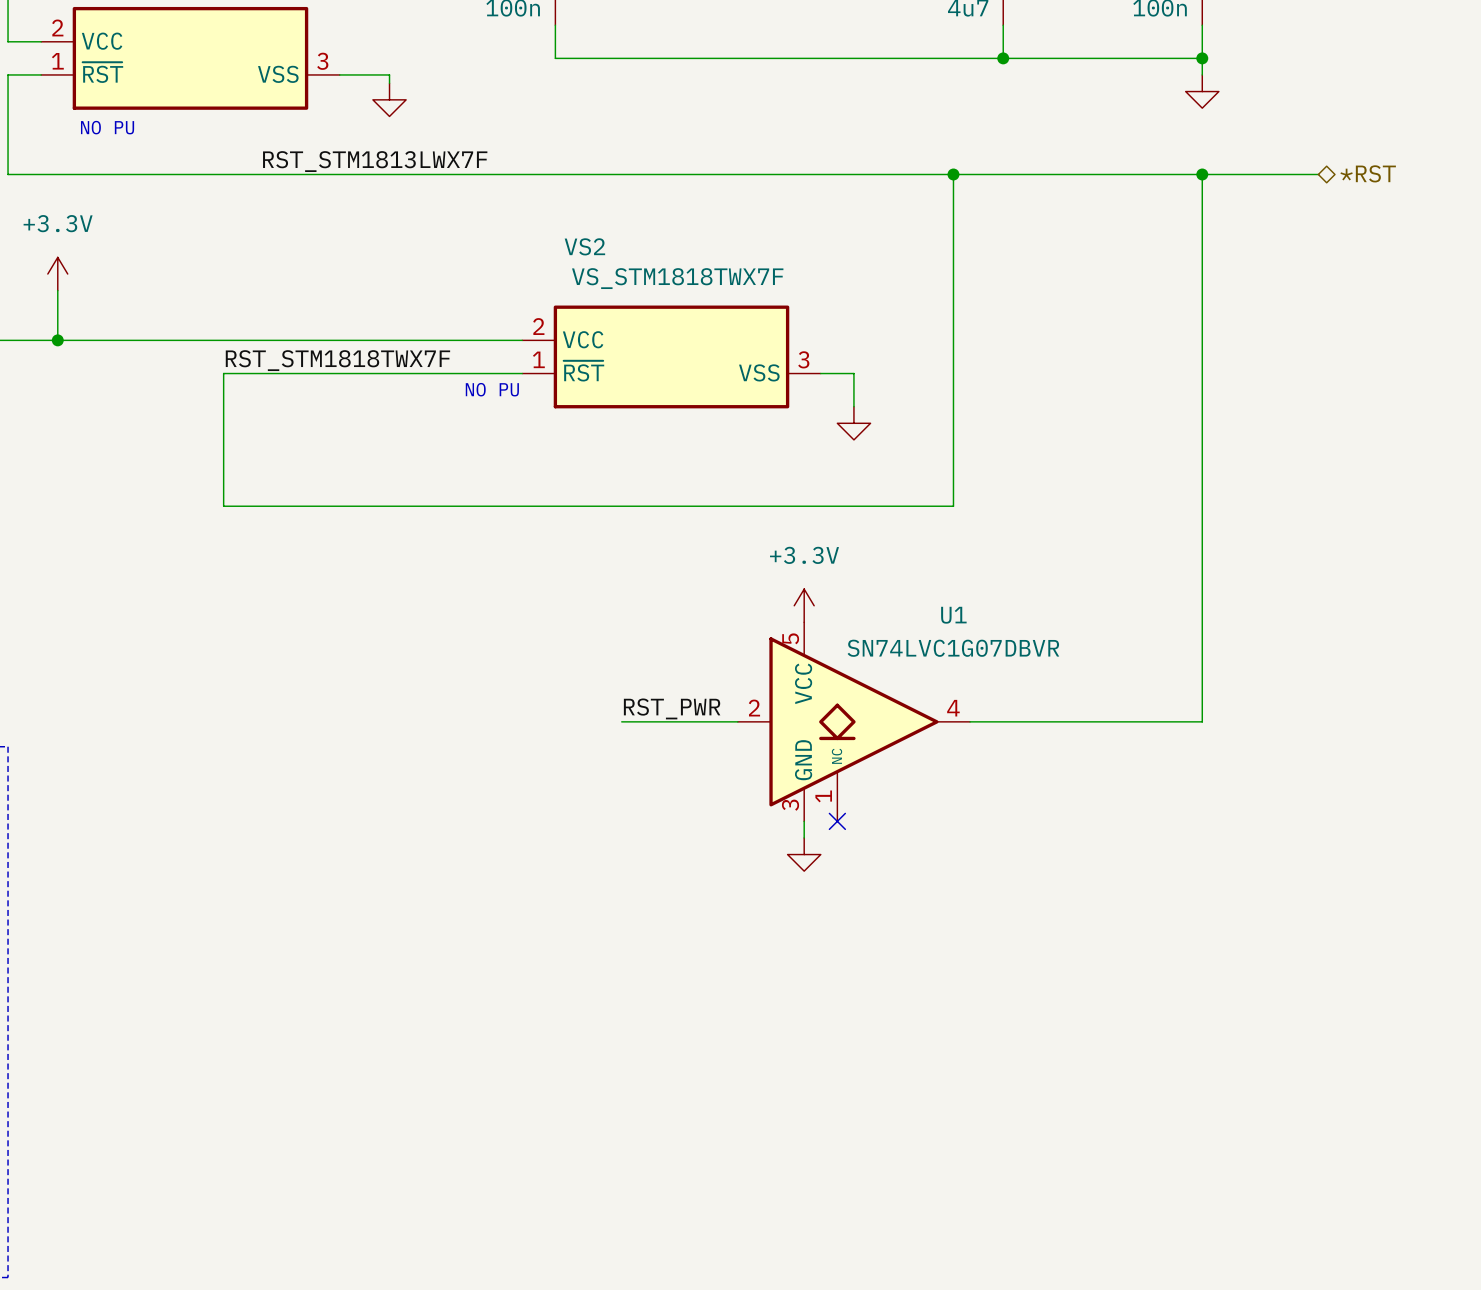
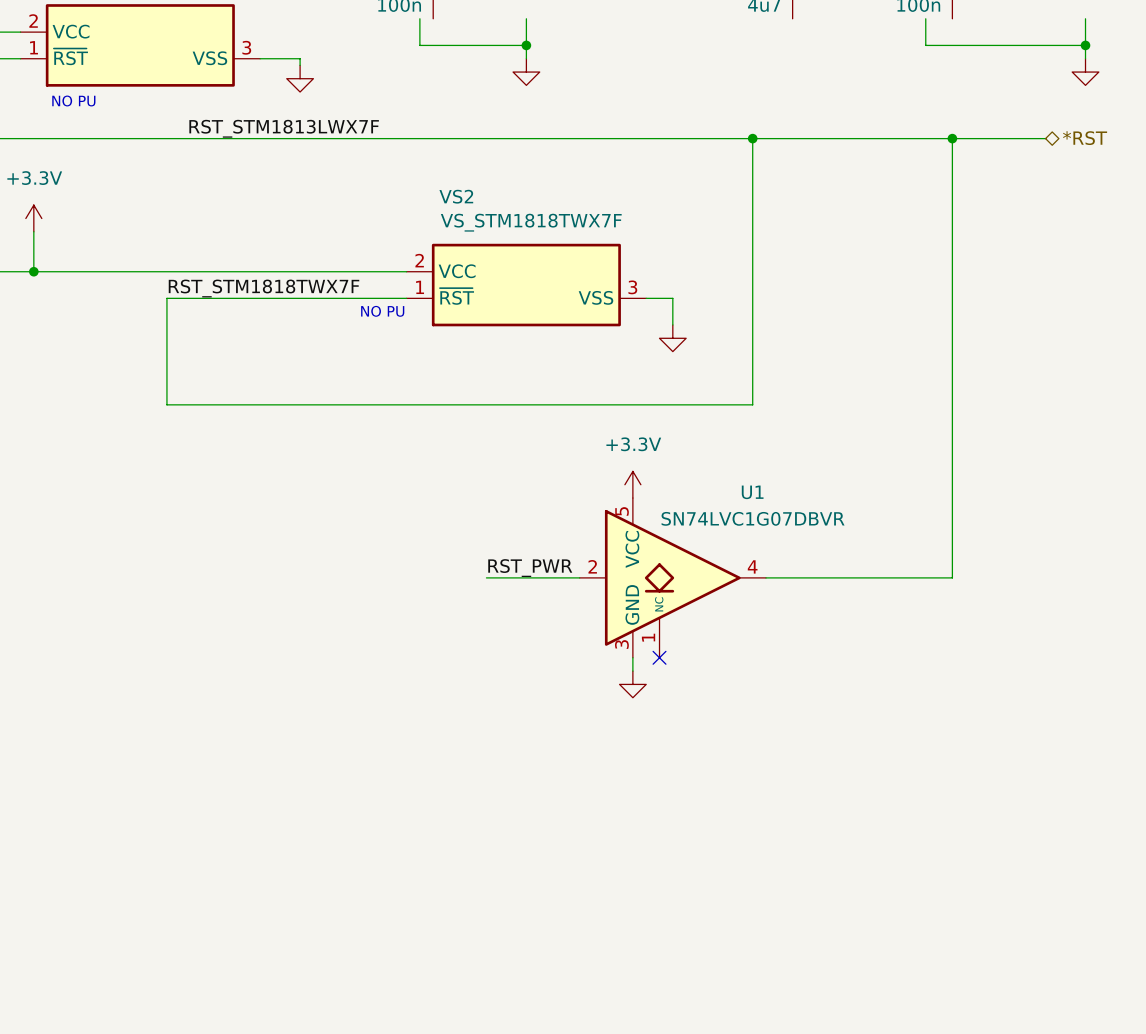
wire: (555, 25) (555, 58) -> (419, 18) (419, 45) (433, 45)
wire: none -> (526, 18) (526, 58)
wire: (1003, 25) (1003, 58) -> none
wire: (1202, 25) (1202, 74) -> (1085, 18) (1085, 58)
wire: (671, 58) (1169, 58) -> (925, 18) (925, 45)
junction: none -> (526, 45)
junction: (1003, 58) -> none
wire: none -> (952, 45) (1085, 45)
junction: (1202, 58) -> none
junction: none -> (1085, 45)
power symbol: none -> (526, 72)
power symbol position: (1202, 91) -> (1085, 72)

